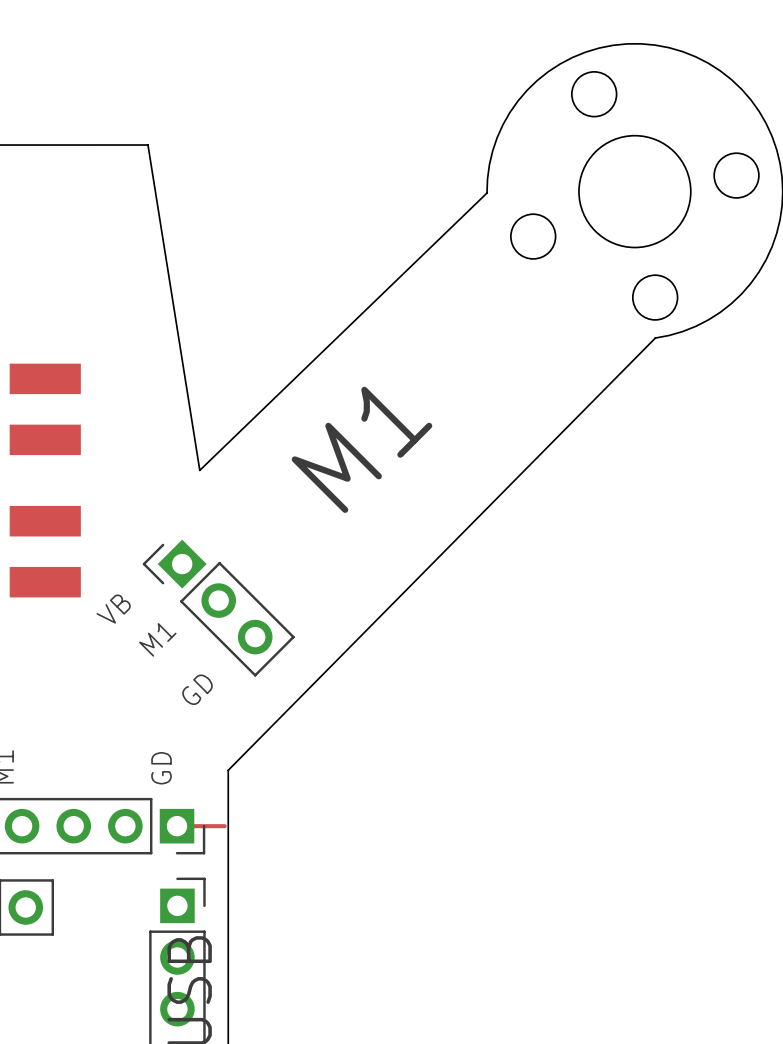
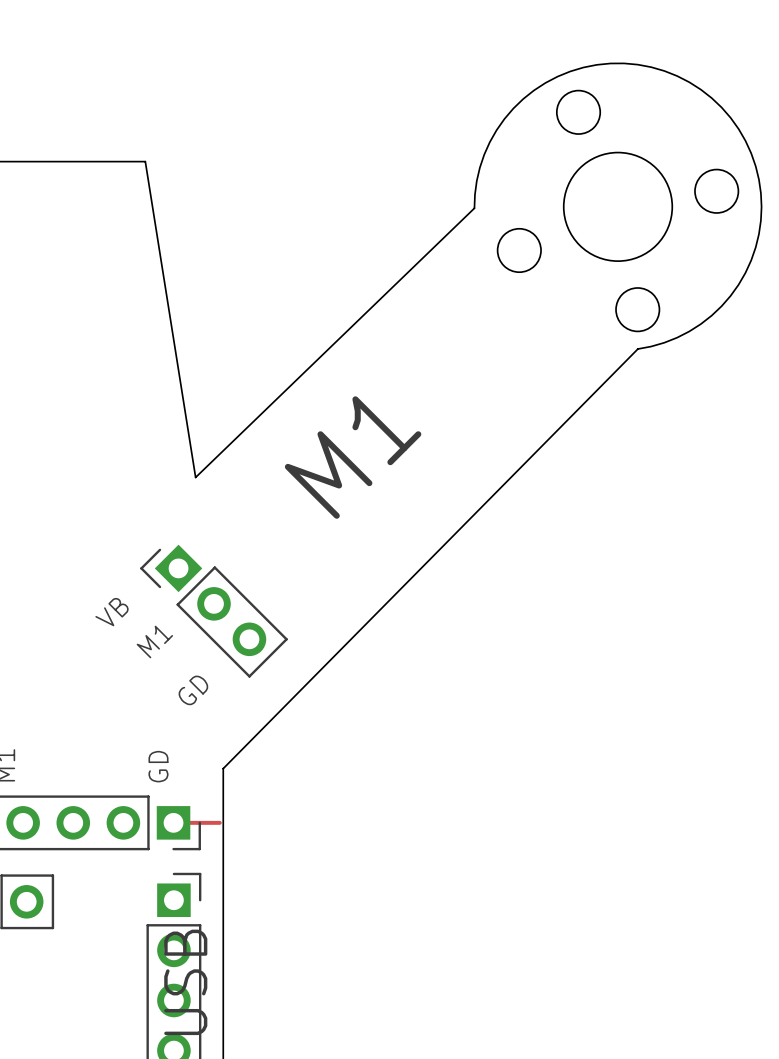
part: (45, 378) -> none
part: (45, 439) -> none
part: (45, 521) -> none
part: (45, 582) -> none

